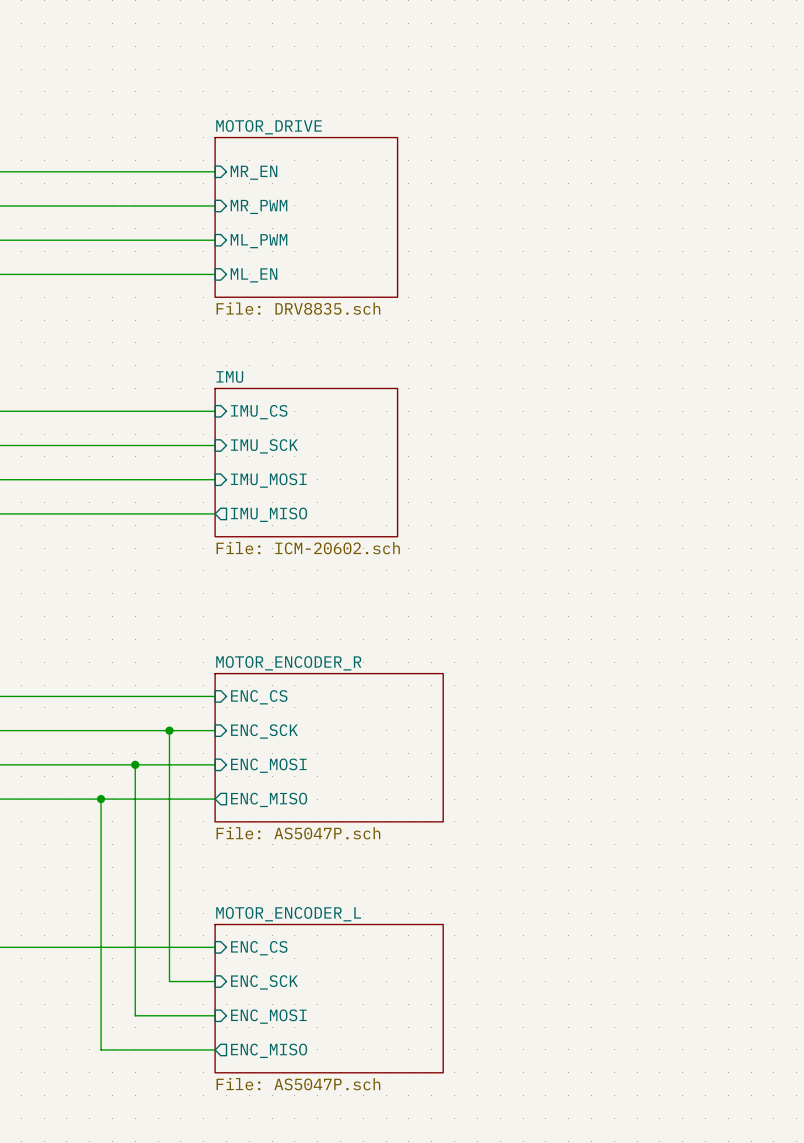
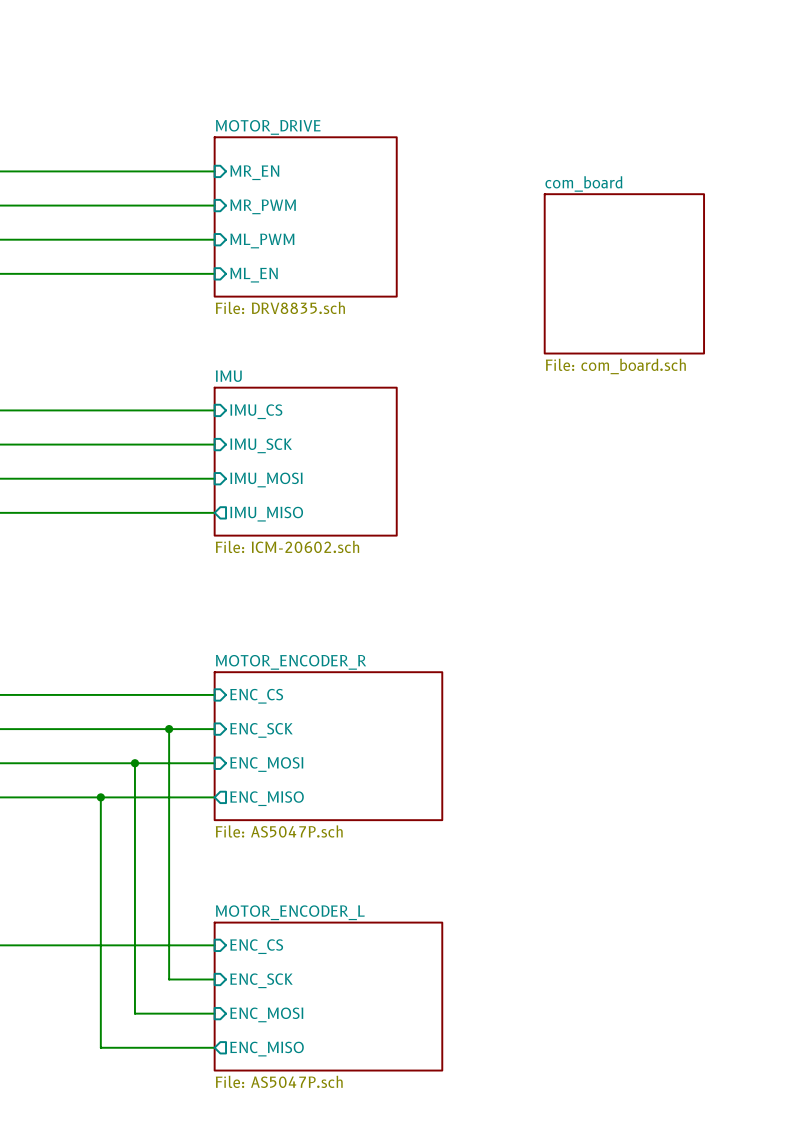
sheet com_board: none -> File: com_board.sch (624, 273)

